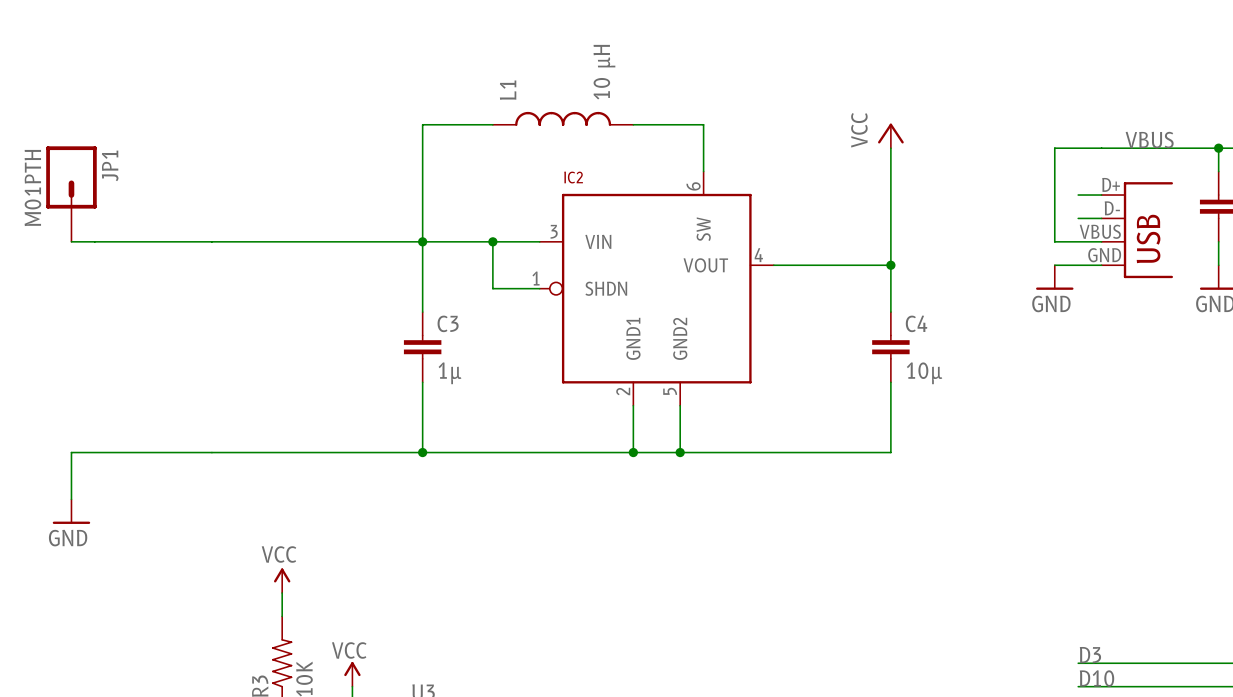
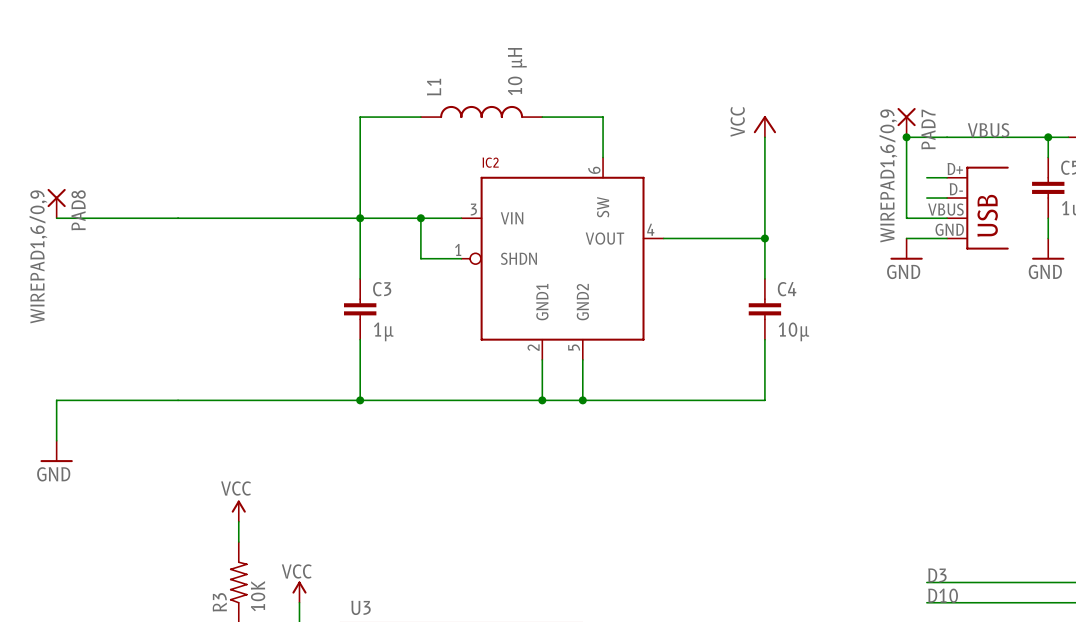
PAD7: none -> WIREPAD1,6/0,9 (906, 122)
junction: none -> (906, 137)
JP1: M01PTH (71, 194) -> none
PAD8: none -> WIREPAD1,6/0,9 (56, 203)

